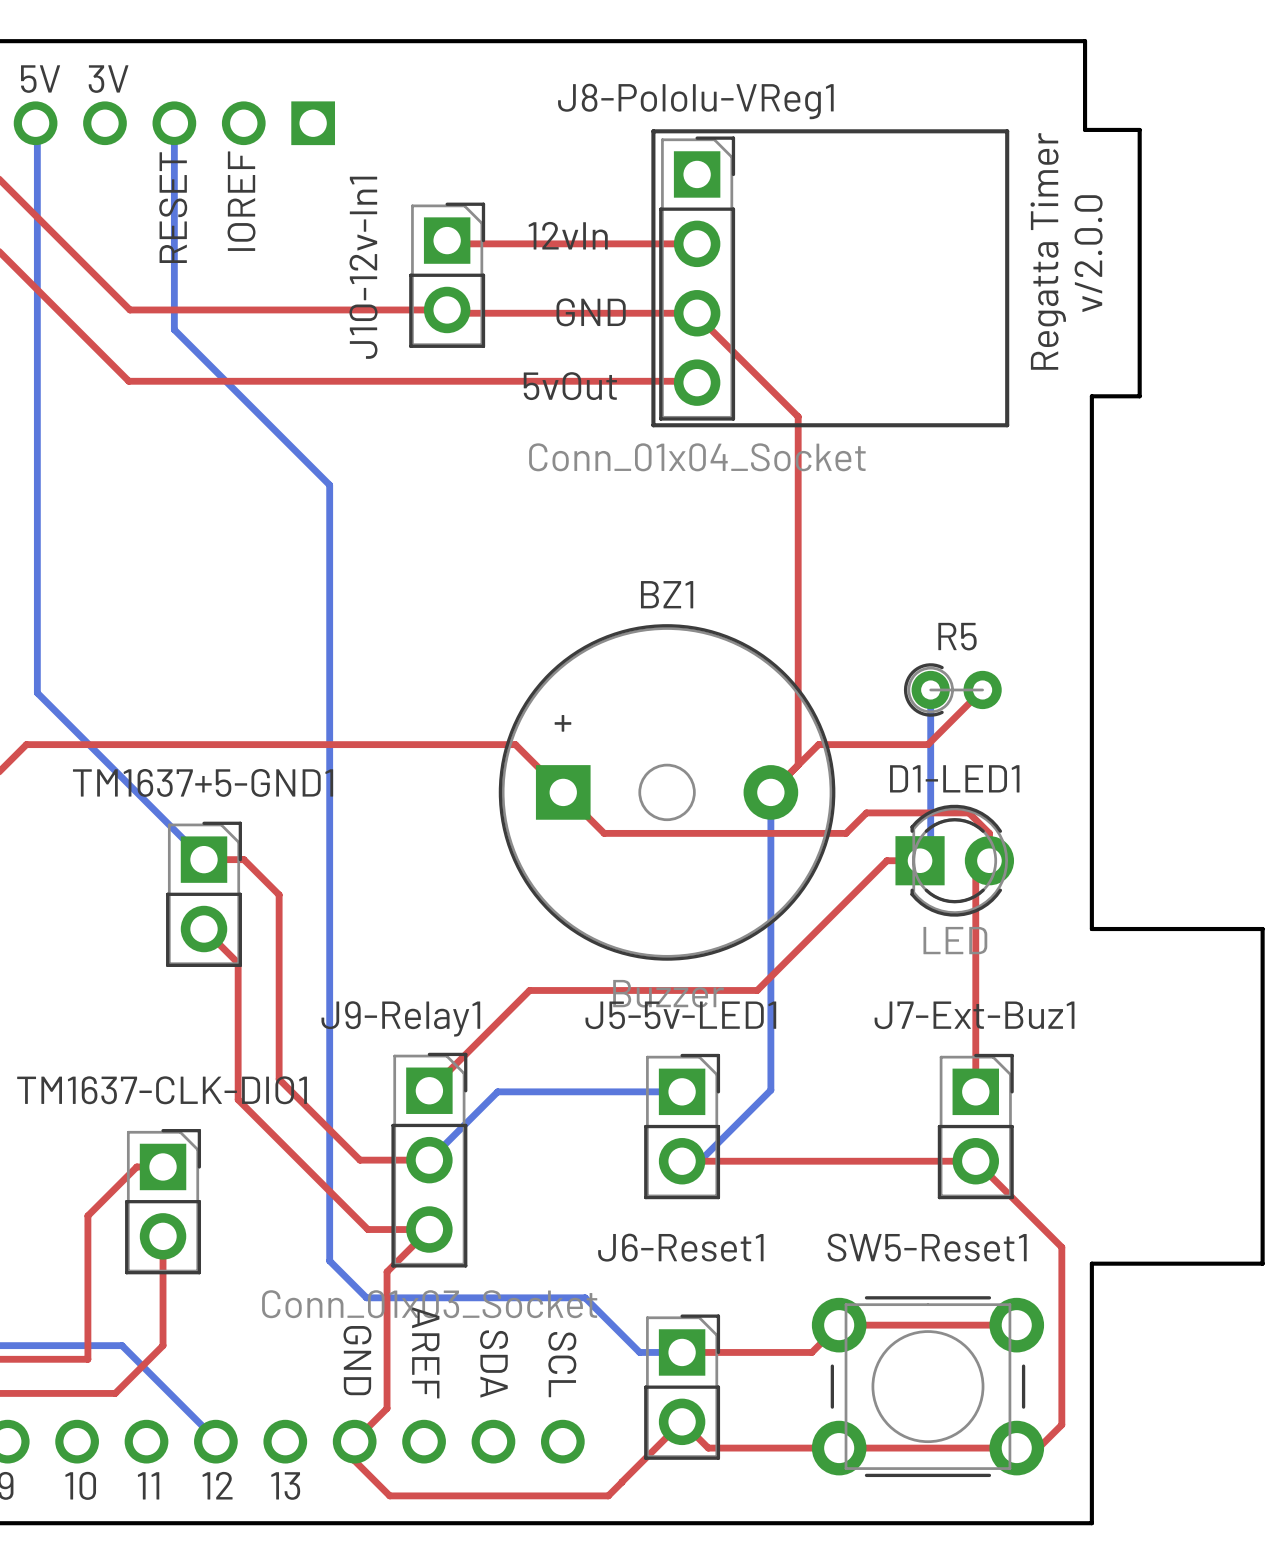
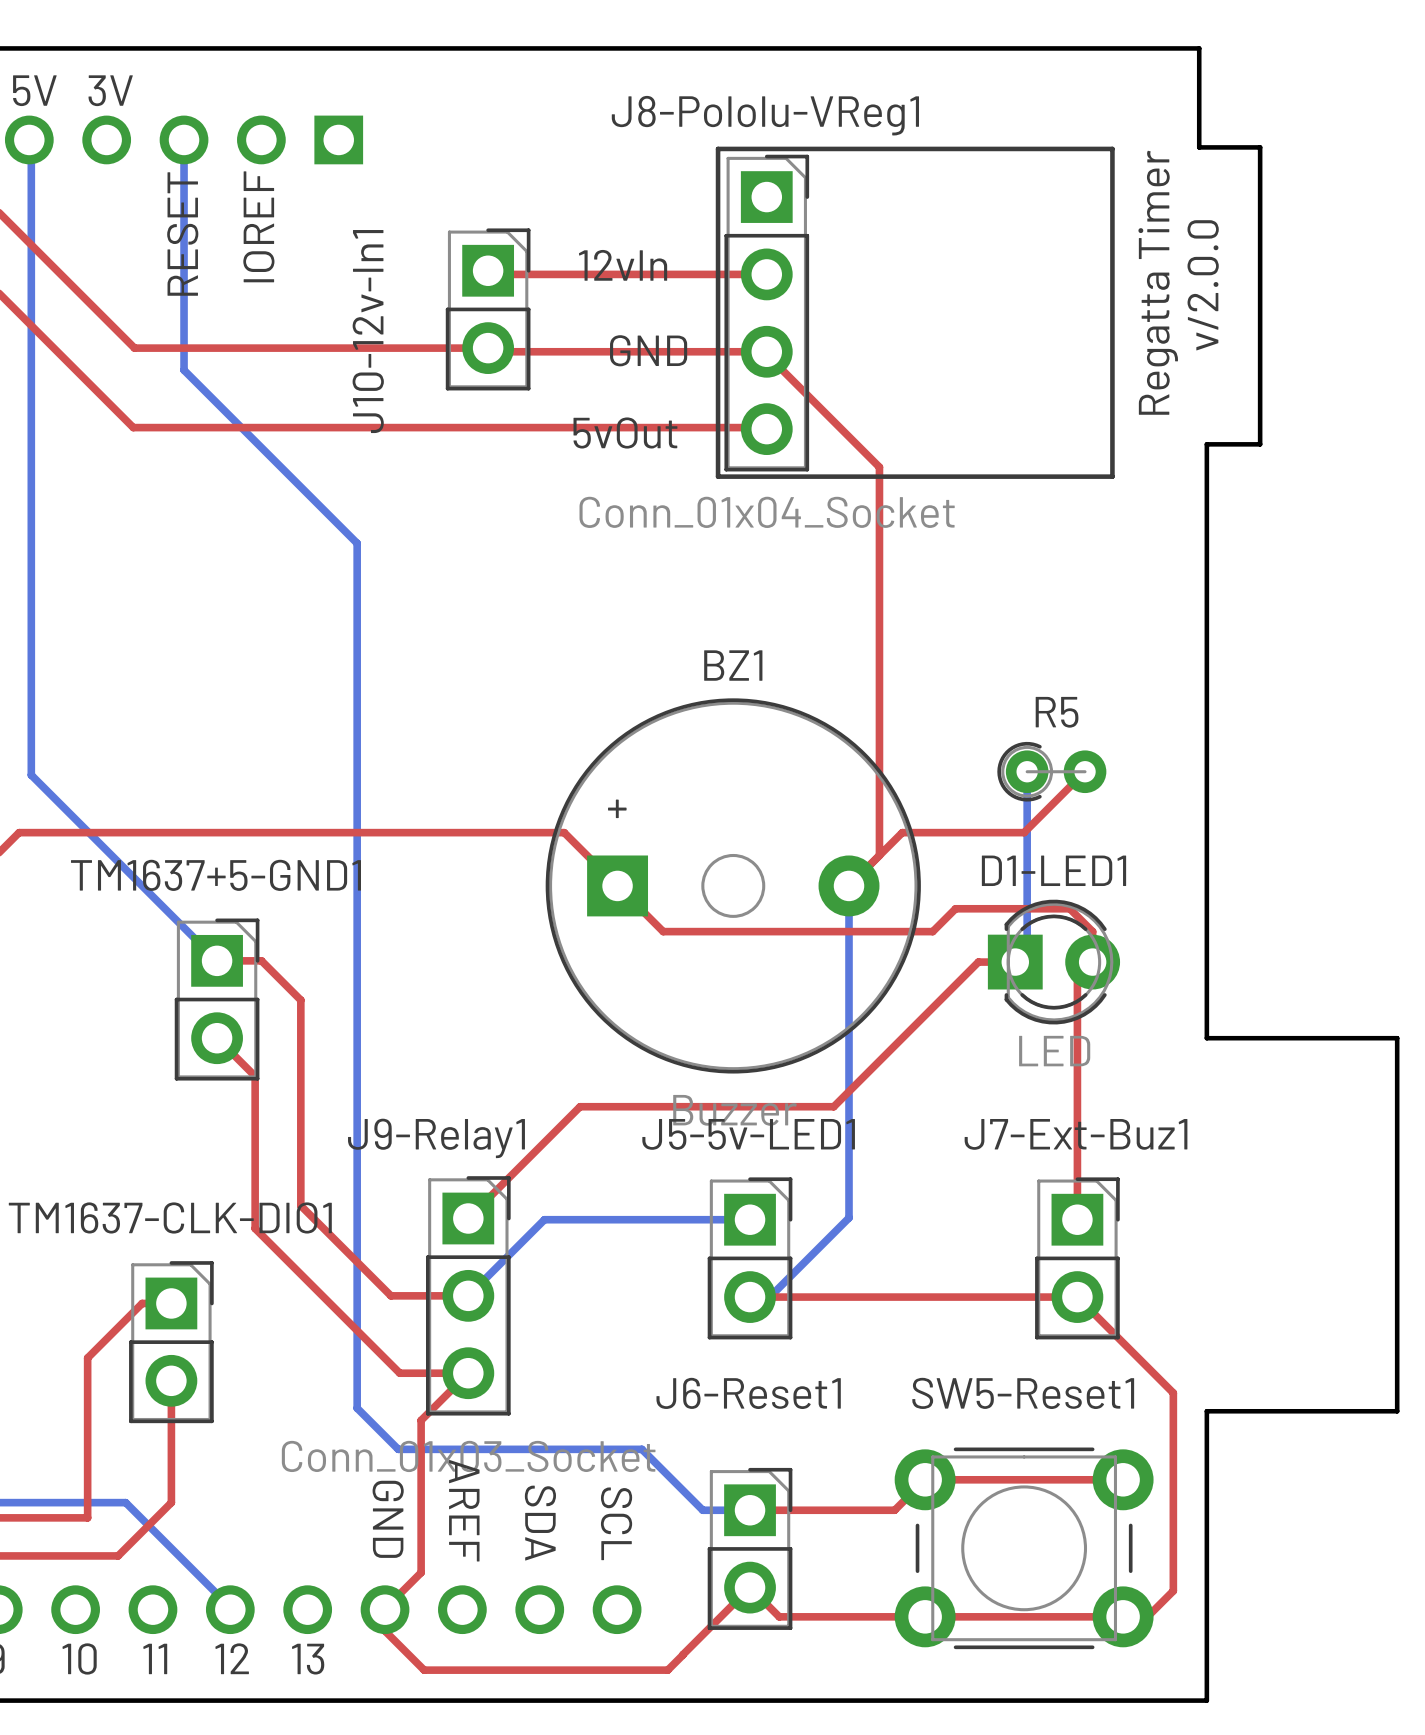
J10-12v-In1 name position: J10-12v-In1 (363, 267) -> J10-12v-In1 (368, 331)

